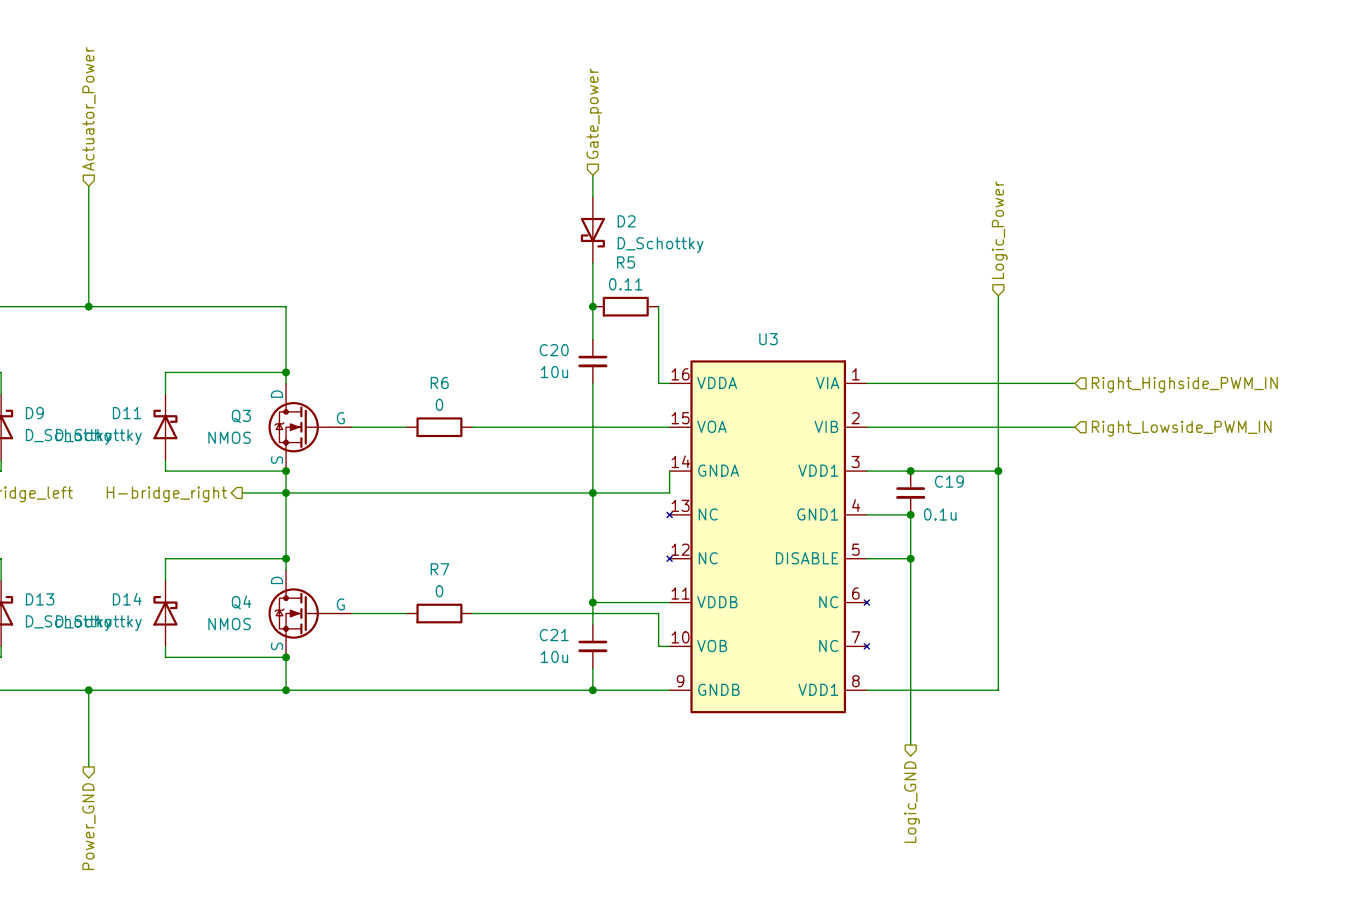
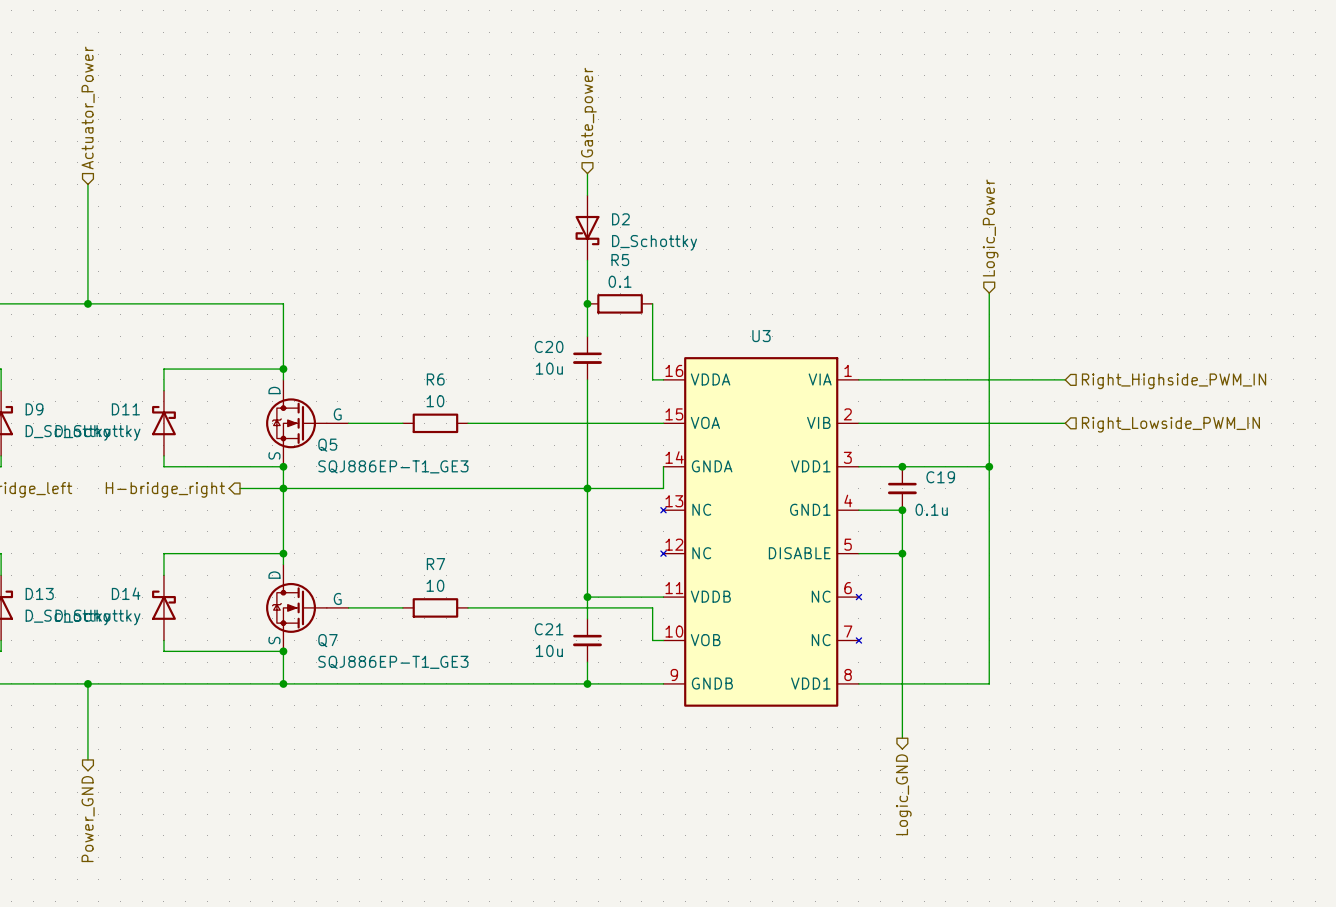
R5 value: 0.11 (625, 284) -> 0.1 (620, 281)
R6 value: 0 (439, 404) -> 10 (435, 401)
Q3 name: Q3 (241, 416) -> Q5 (327, 445)
Q3 value: NMOS (229, 437) -> SQJ886EP-T1_GE3 (393, 466)
R7 value: 0 (439, 591) -> 10 (435, 585)
Q4 name: Q4 (241, 602) -> Q7 (327, 640)
Q4 value: NMOS (229, 624) -> SQJ886EP-T1_GE3 (393, 662)

